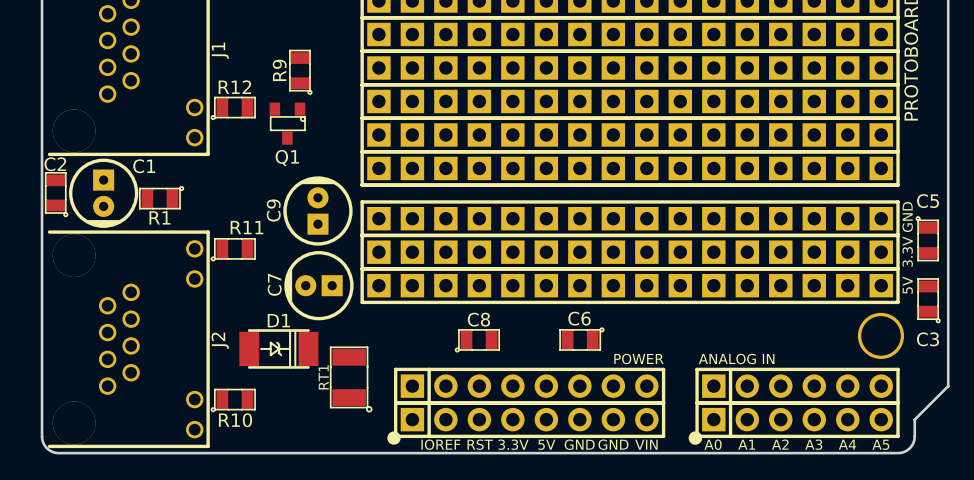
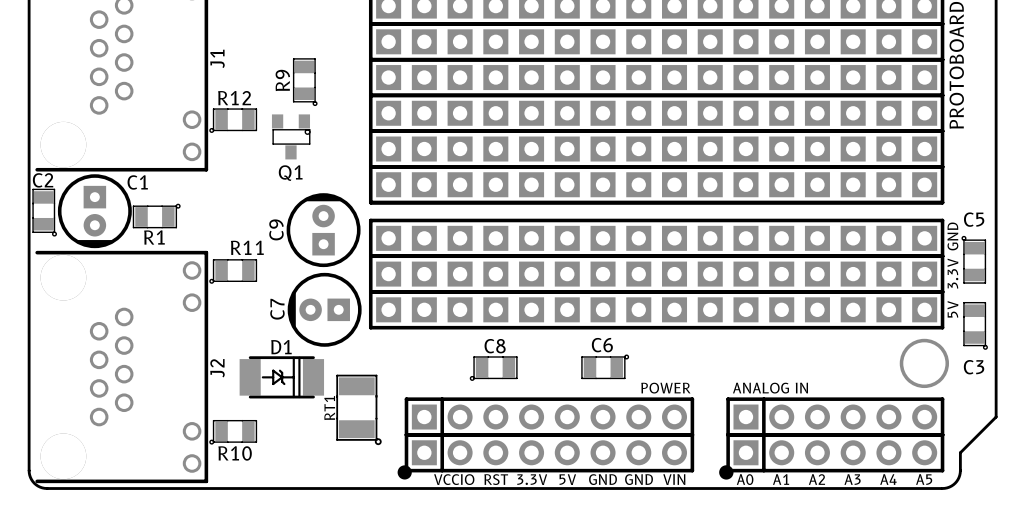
text: IOREF (440, 444) -> VCCIO (454, 479)

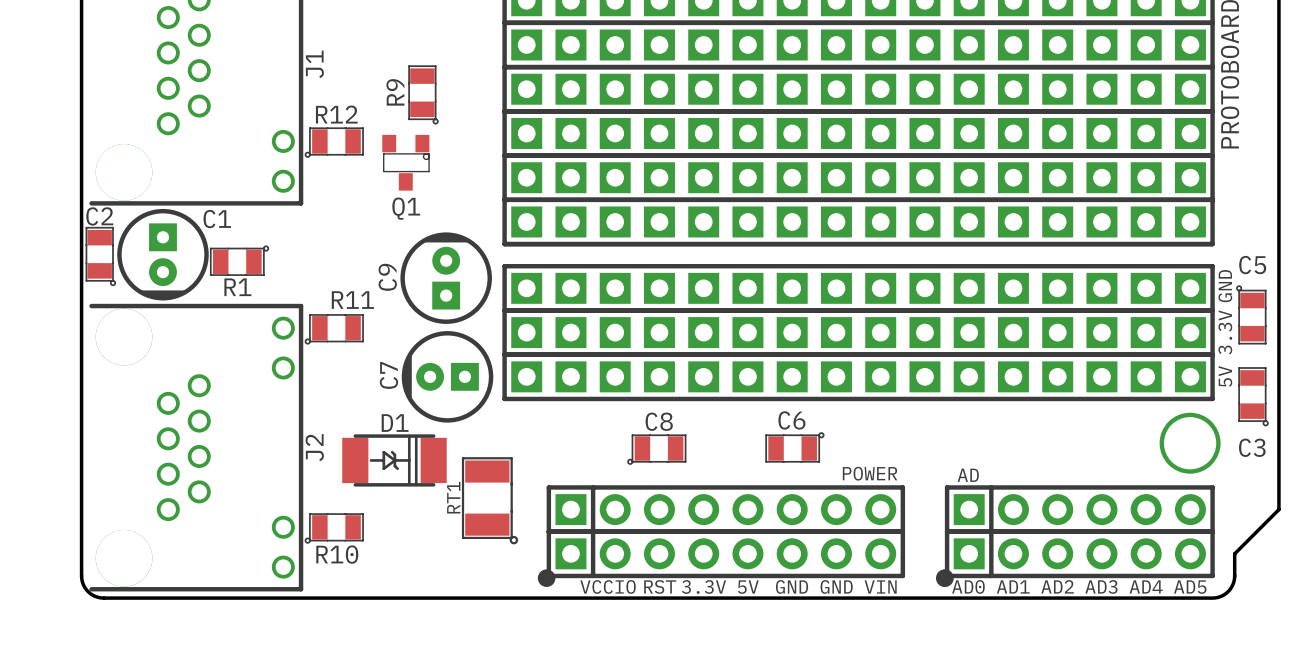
text: ANALOG IN (770, 388) -> none
text: none -> AD (968, 475)
text: A0 (745, 479) -> AD0 (968, 586)
text: A1 (781, 479) -> AD1 (1013, 586)
text: A2 (816, 479) -> AD2 (1057, 586)
text: A3 (852, 479) -> AD3 (1101, 586)
text: A4 (888, 479) -> AD4 (1146, 586)
text: A5 (924, 479) -> AD5 (1190, 587)

